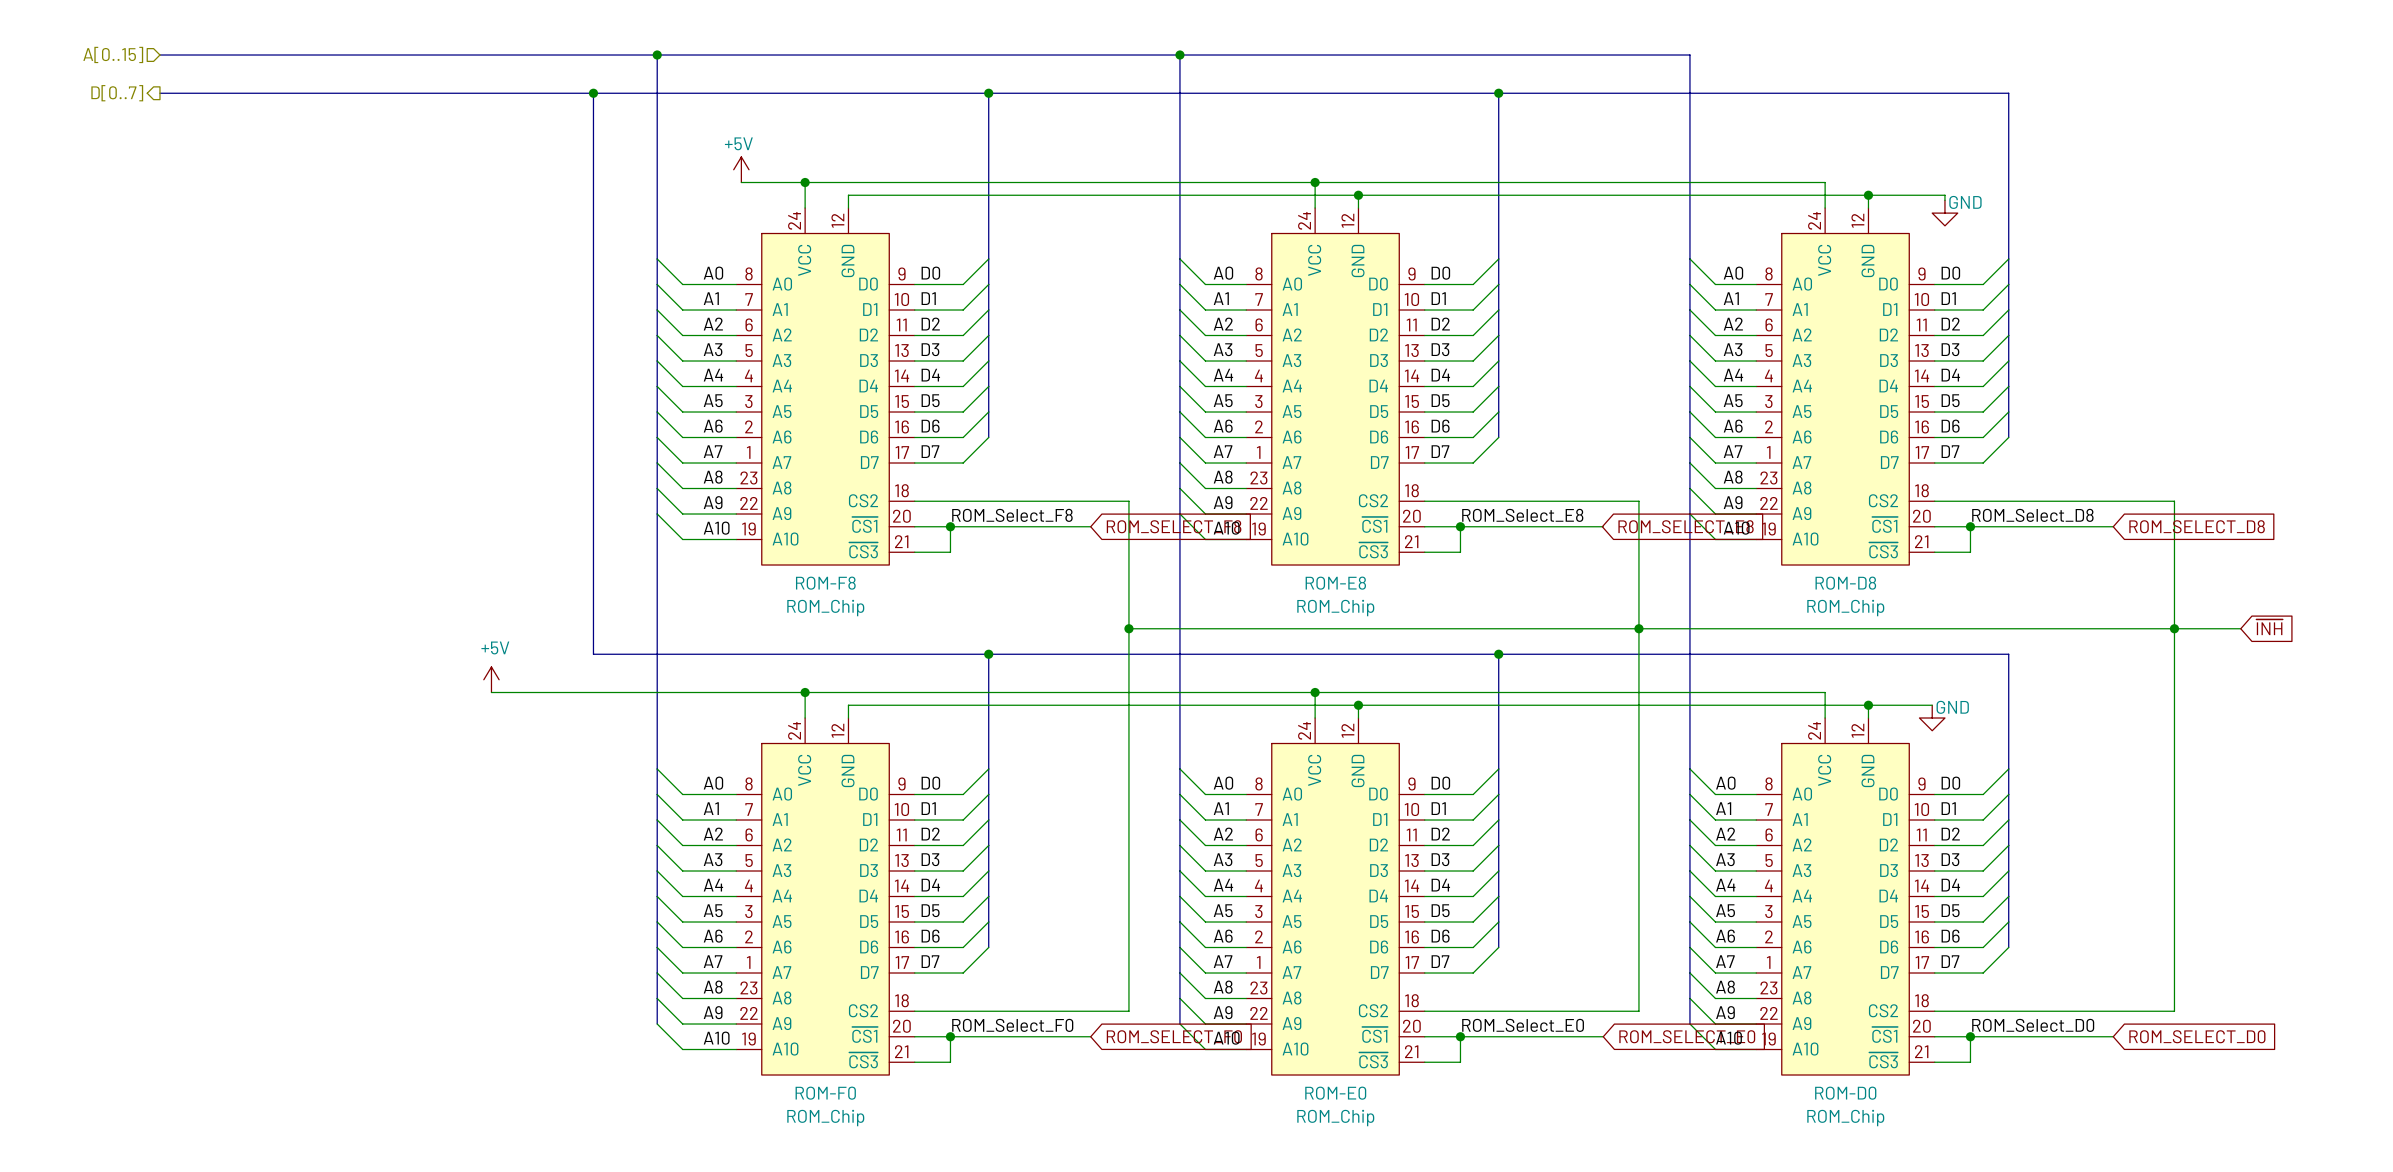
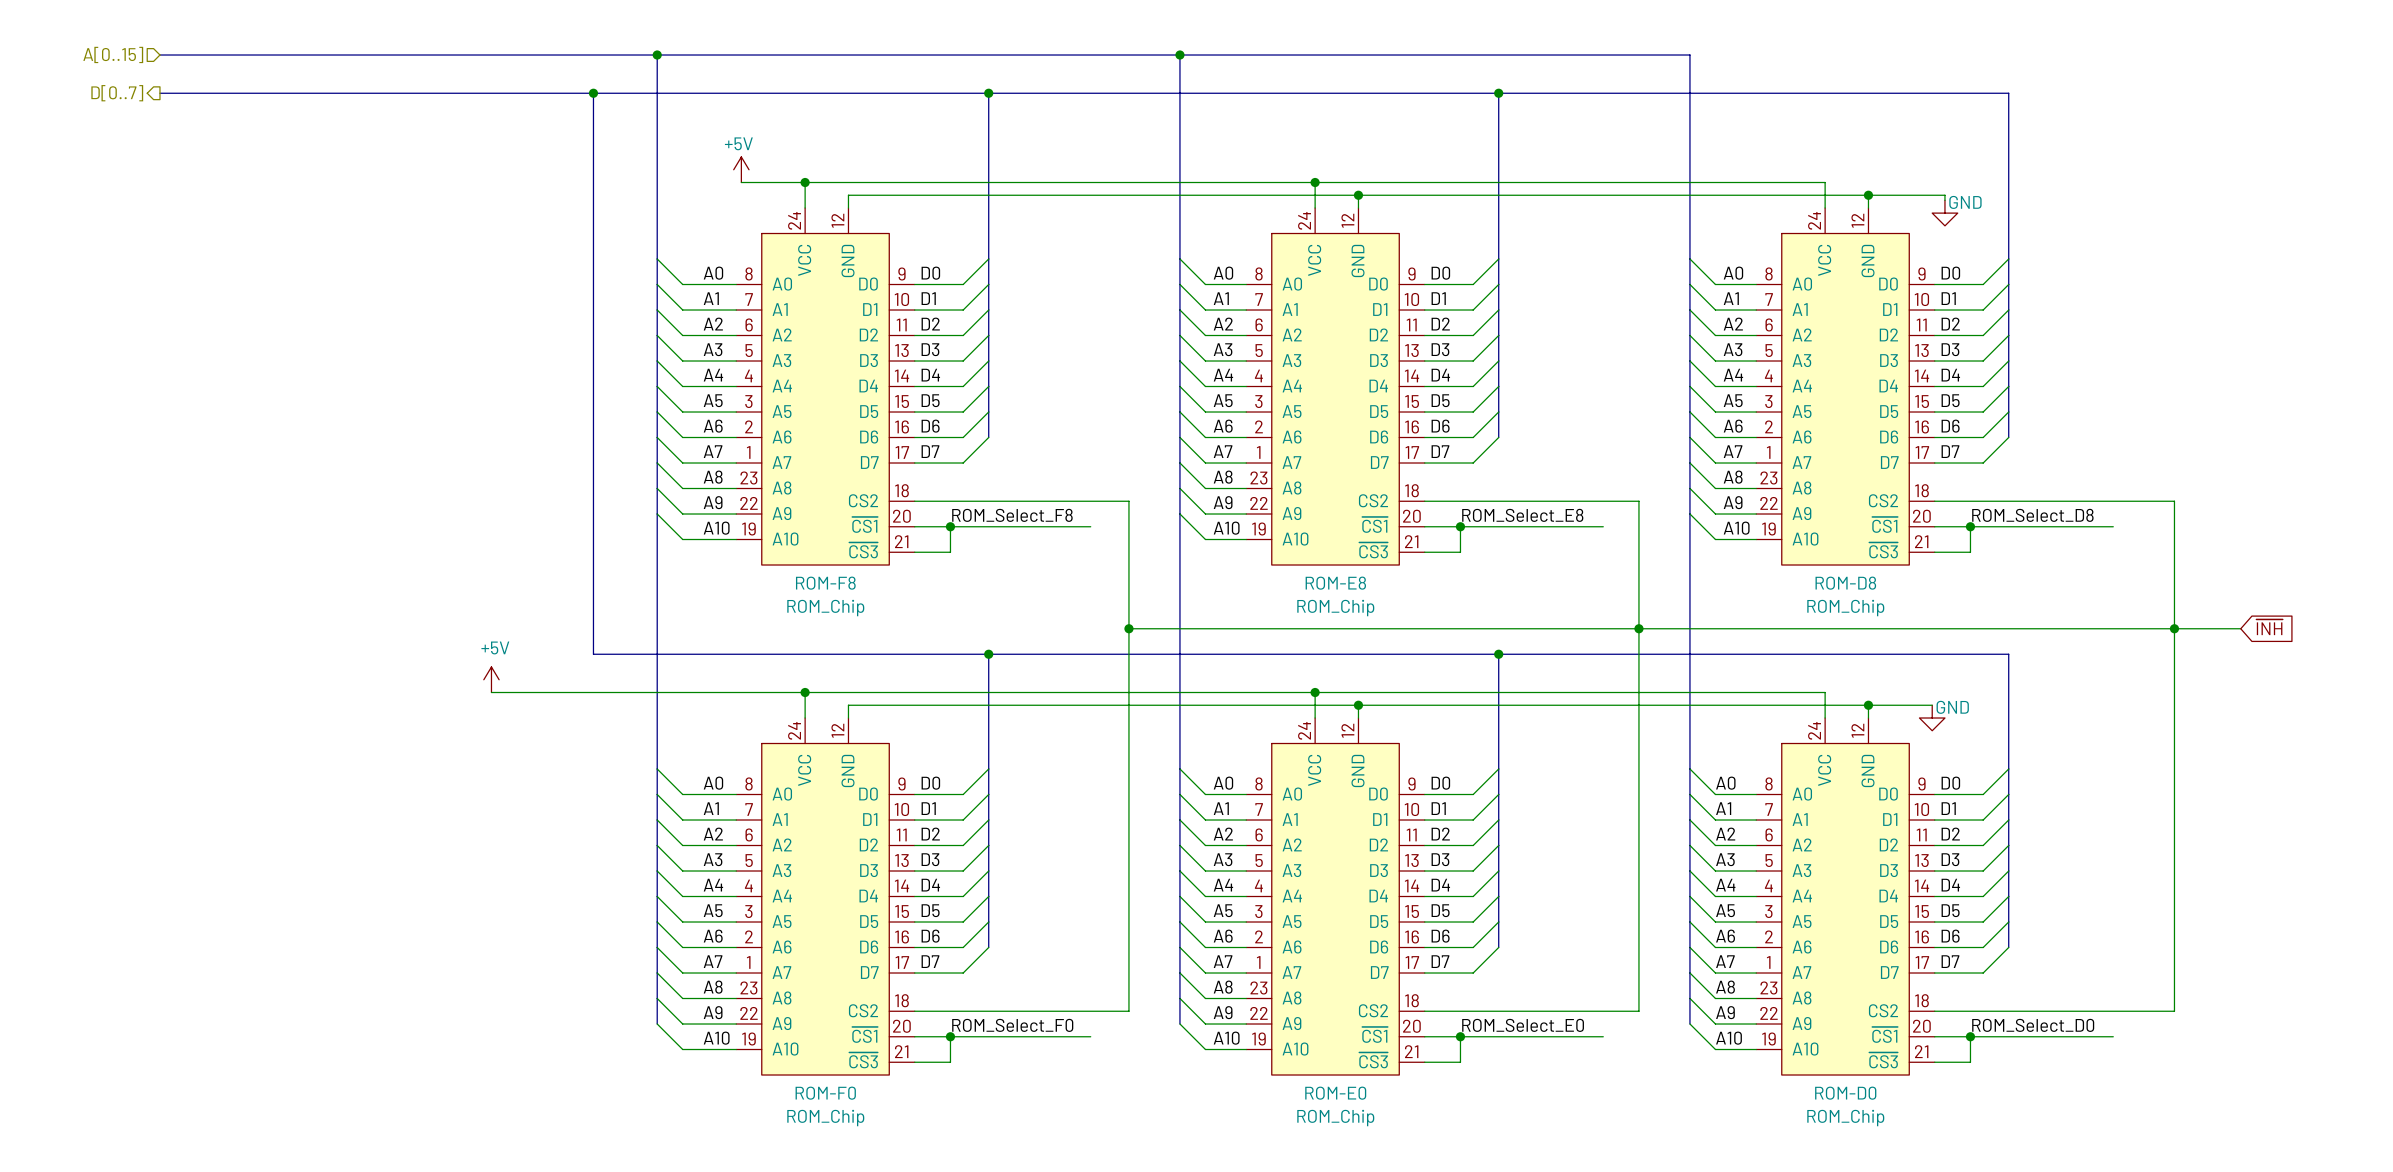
global label: ROM_SELECT_F8 (1174, 526) -> none
global label: ROM_SELECT_E8 (1686, 526) -> none
global label: ROM_SELECT_D8 (2197, 526) -> none
global label: ROM_SELECT_F0 (1174, 1036) -> none
global label: ROM_SELECT_E0 (1687, 1036) -> none
global label: ROM_SELECT_D0 (2197, 1036) -> none

